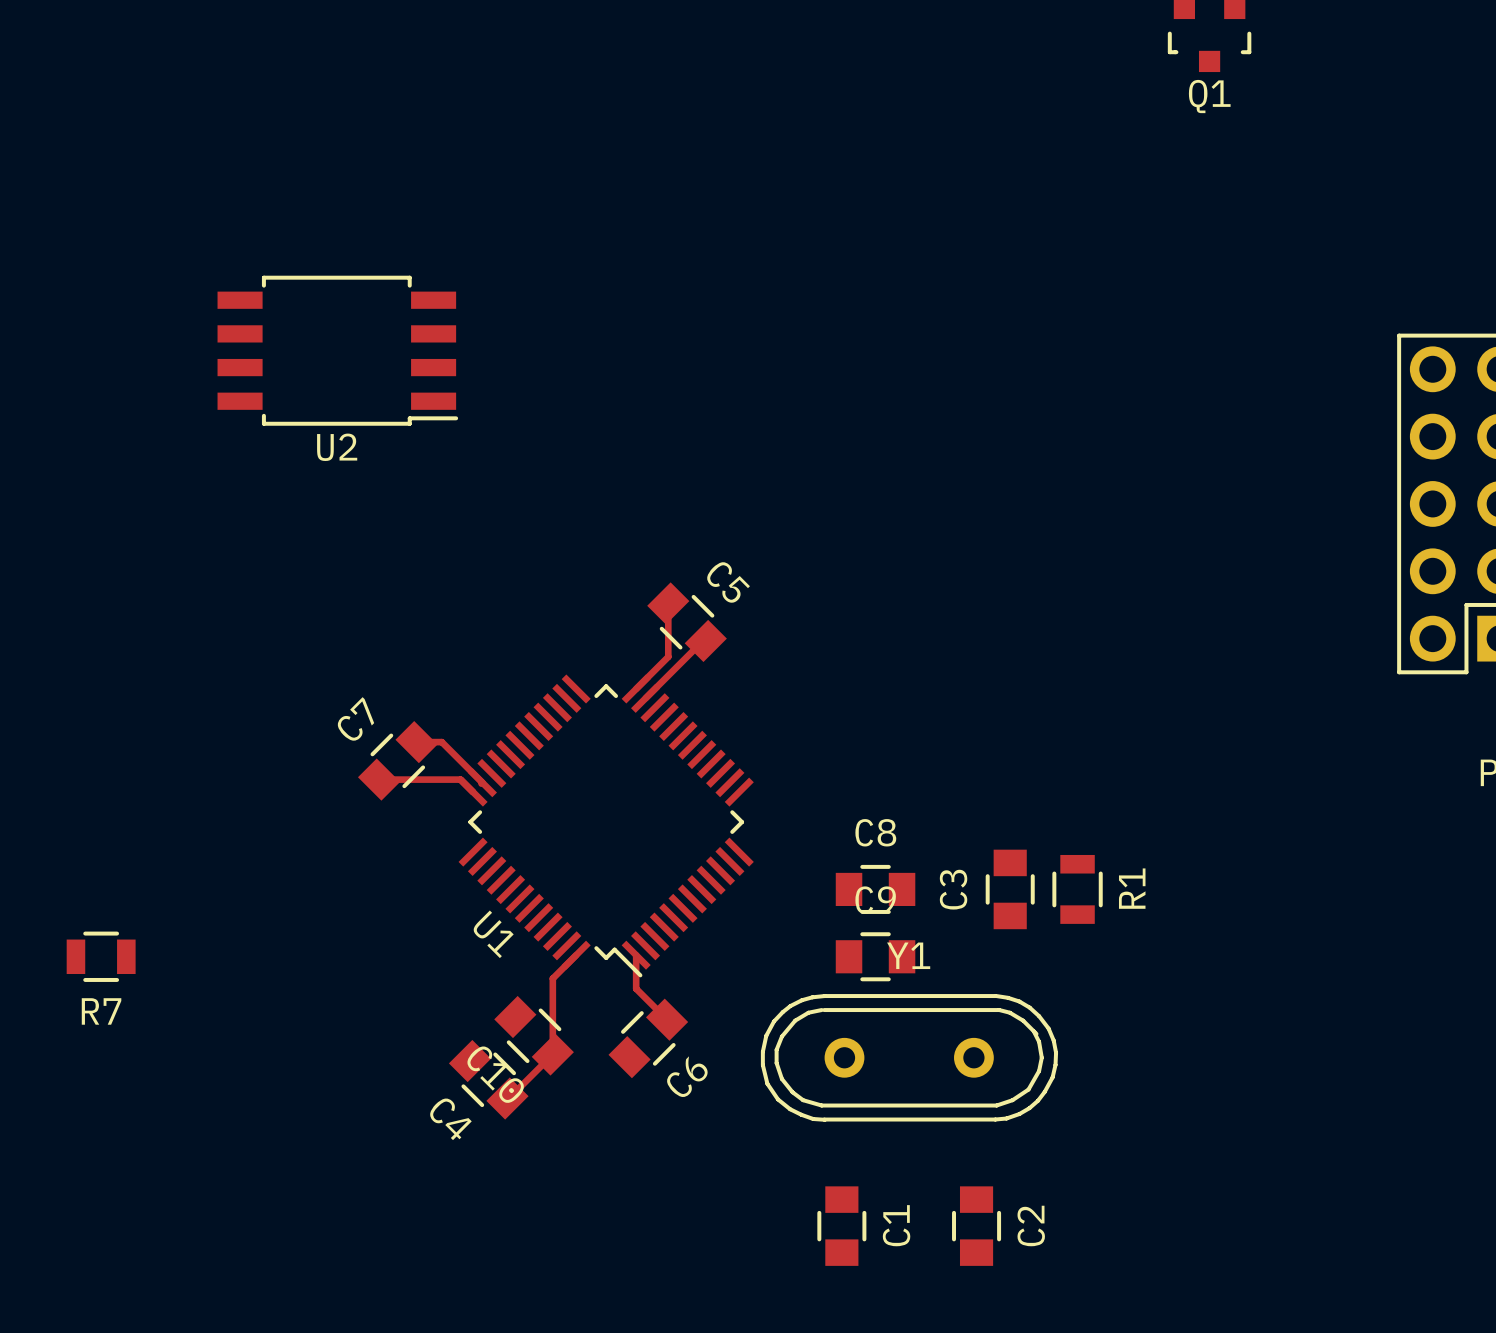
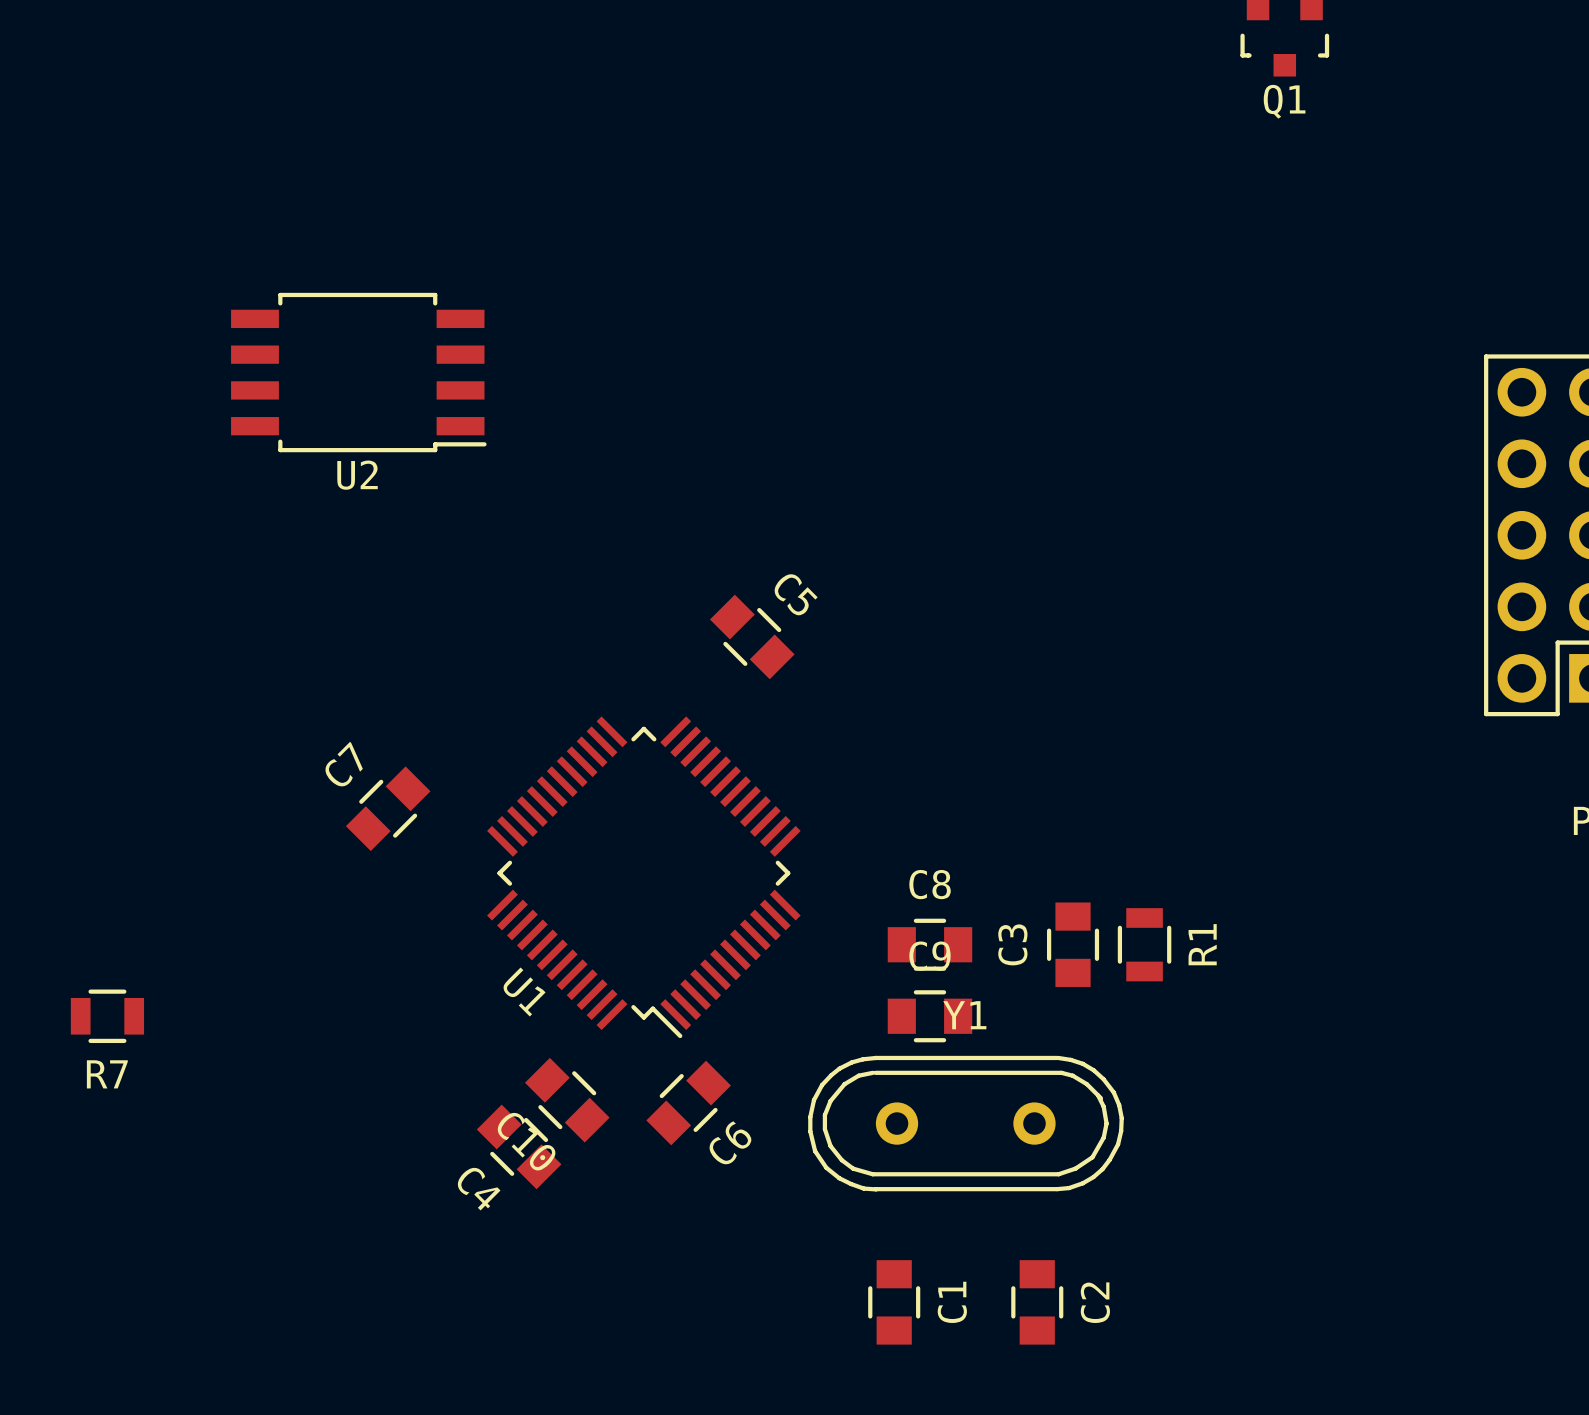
top track: (668, 603) (668, 656) (636, 688) -> none
C5 position: (687, 622) -> (752, 636)
top track: (705, 640) (702, 640) (645, 698) -> none
top track: (416, 742) (441, 742) (481, 783) -> none
C7 position: (397, 760) -> (388, 808)
top track: (379, 779) (460, 779) (473, 792) -> none
top track: (576, 955) (552, 978) (552, 1054) (507, 1098) -> none
top track: (636, 955) (636, 988) (667, 1019) -> none

